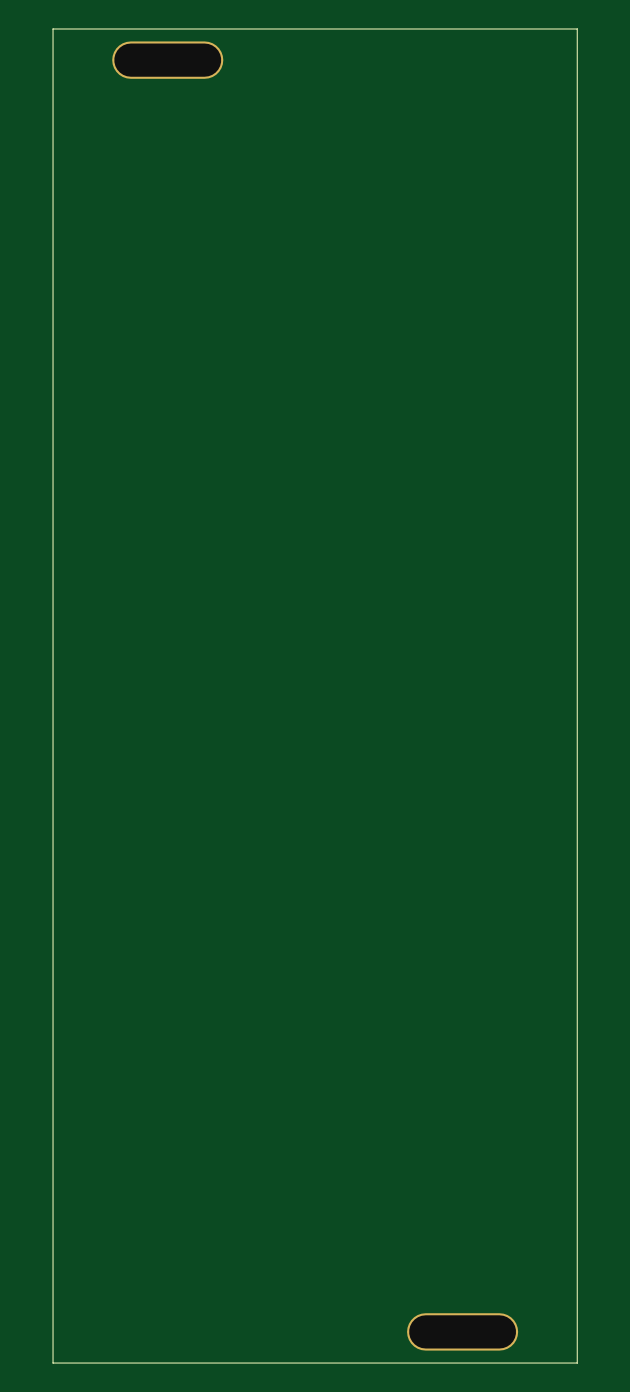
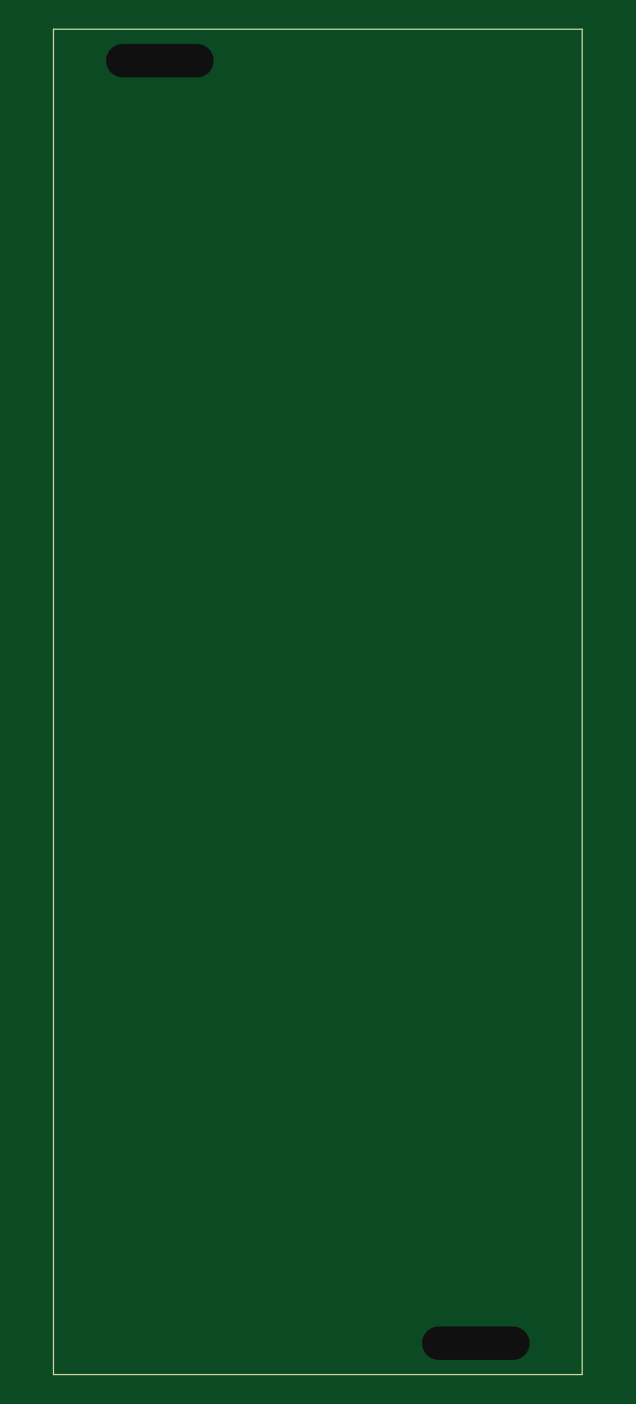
part footprint: [112, 41, 224, 79] -> [106, 43, 214, 78]
part footprint: [407, 1313, 519, 1351] -> [422, 1326, 530, 1360]

